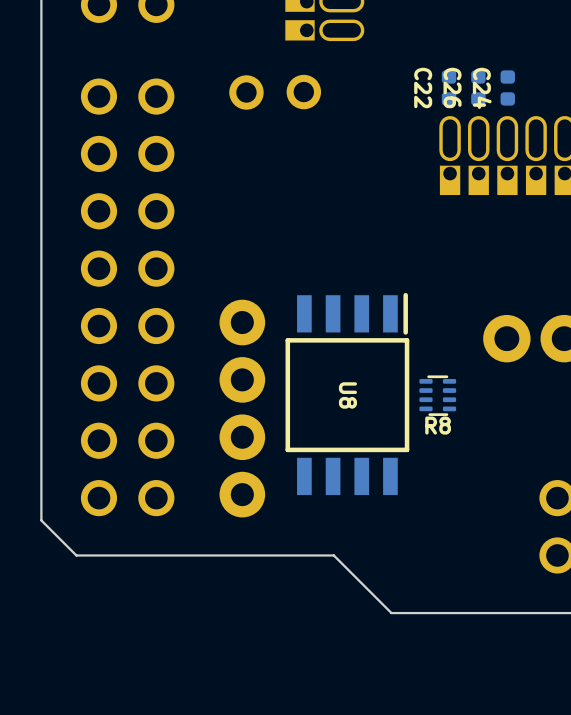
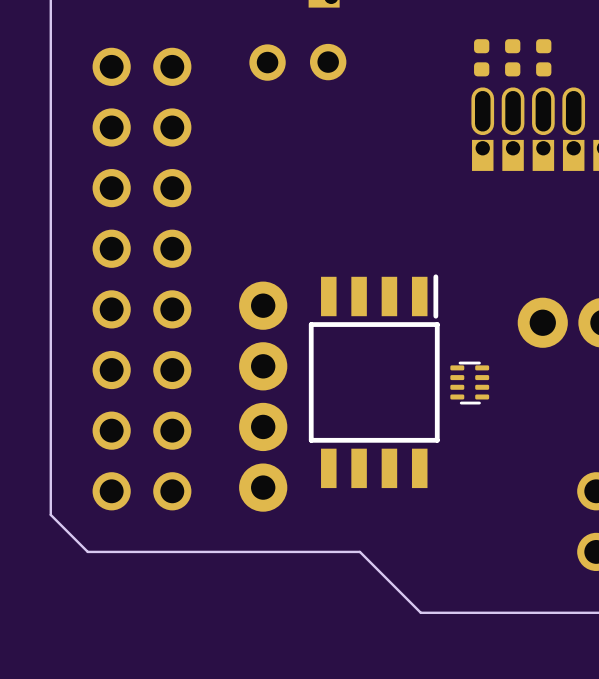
C22 name: C22 (423, 87) -> none
C26 name: C26 (452, 87) -> none
C24 name: C24 (482, 88) -> none
U8 name: U8 (347, 395) -> none
R8 name: R8 (438, 425) -> none

